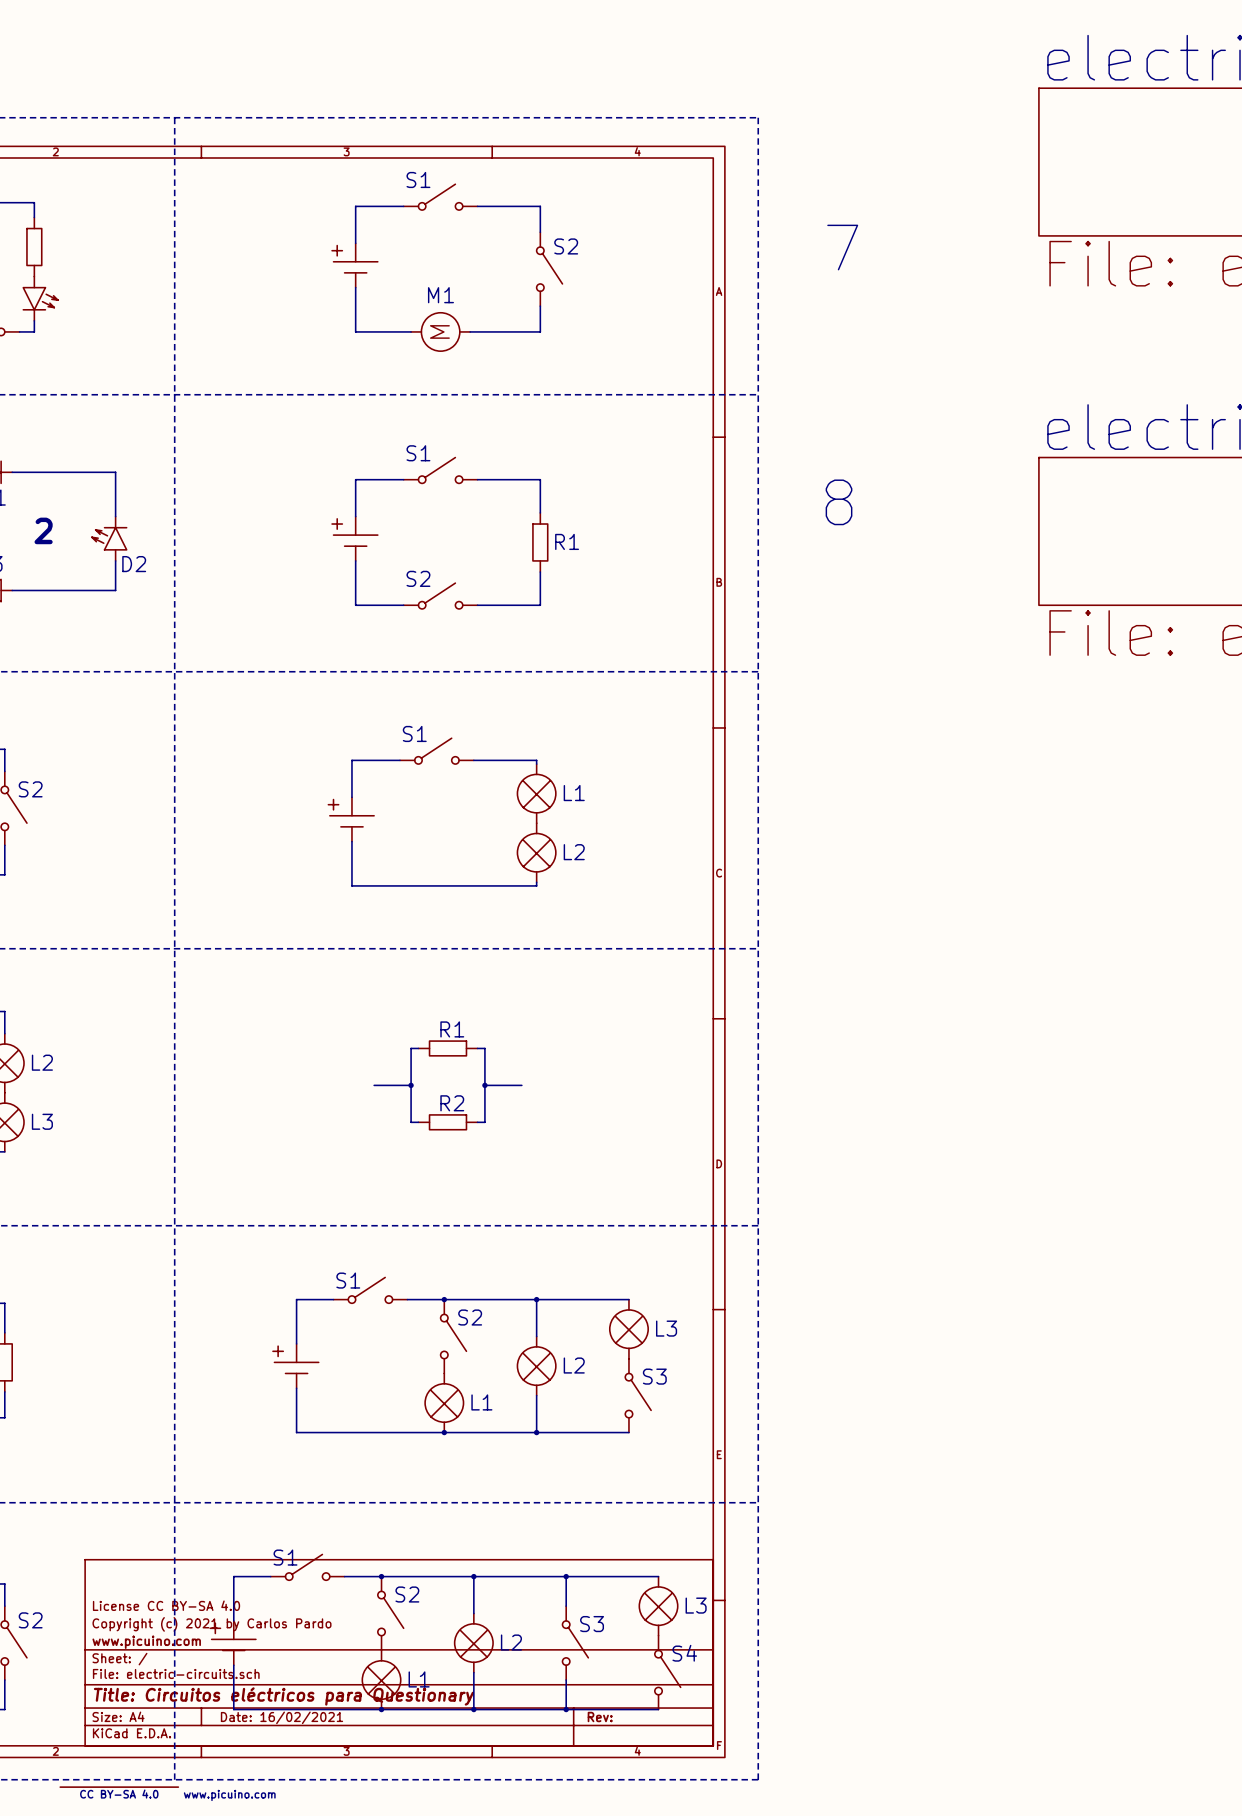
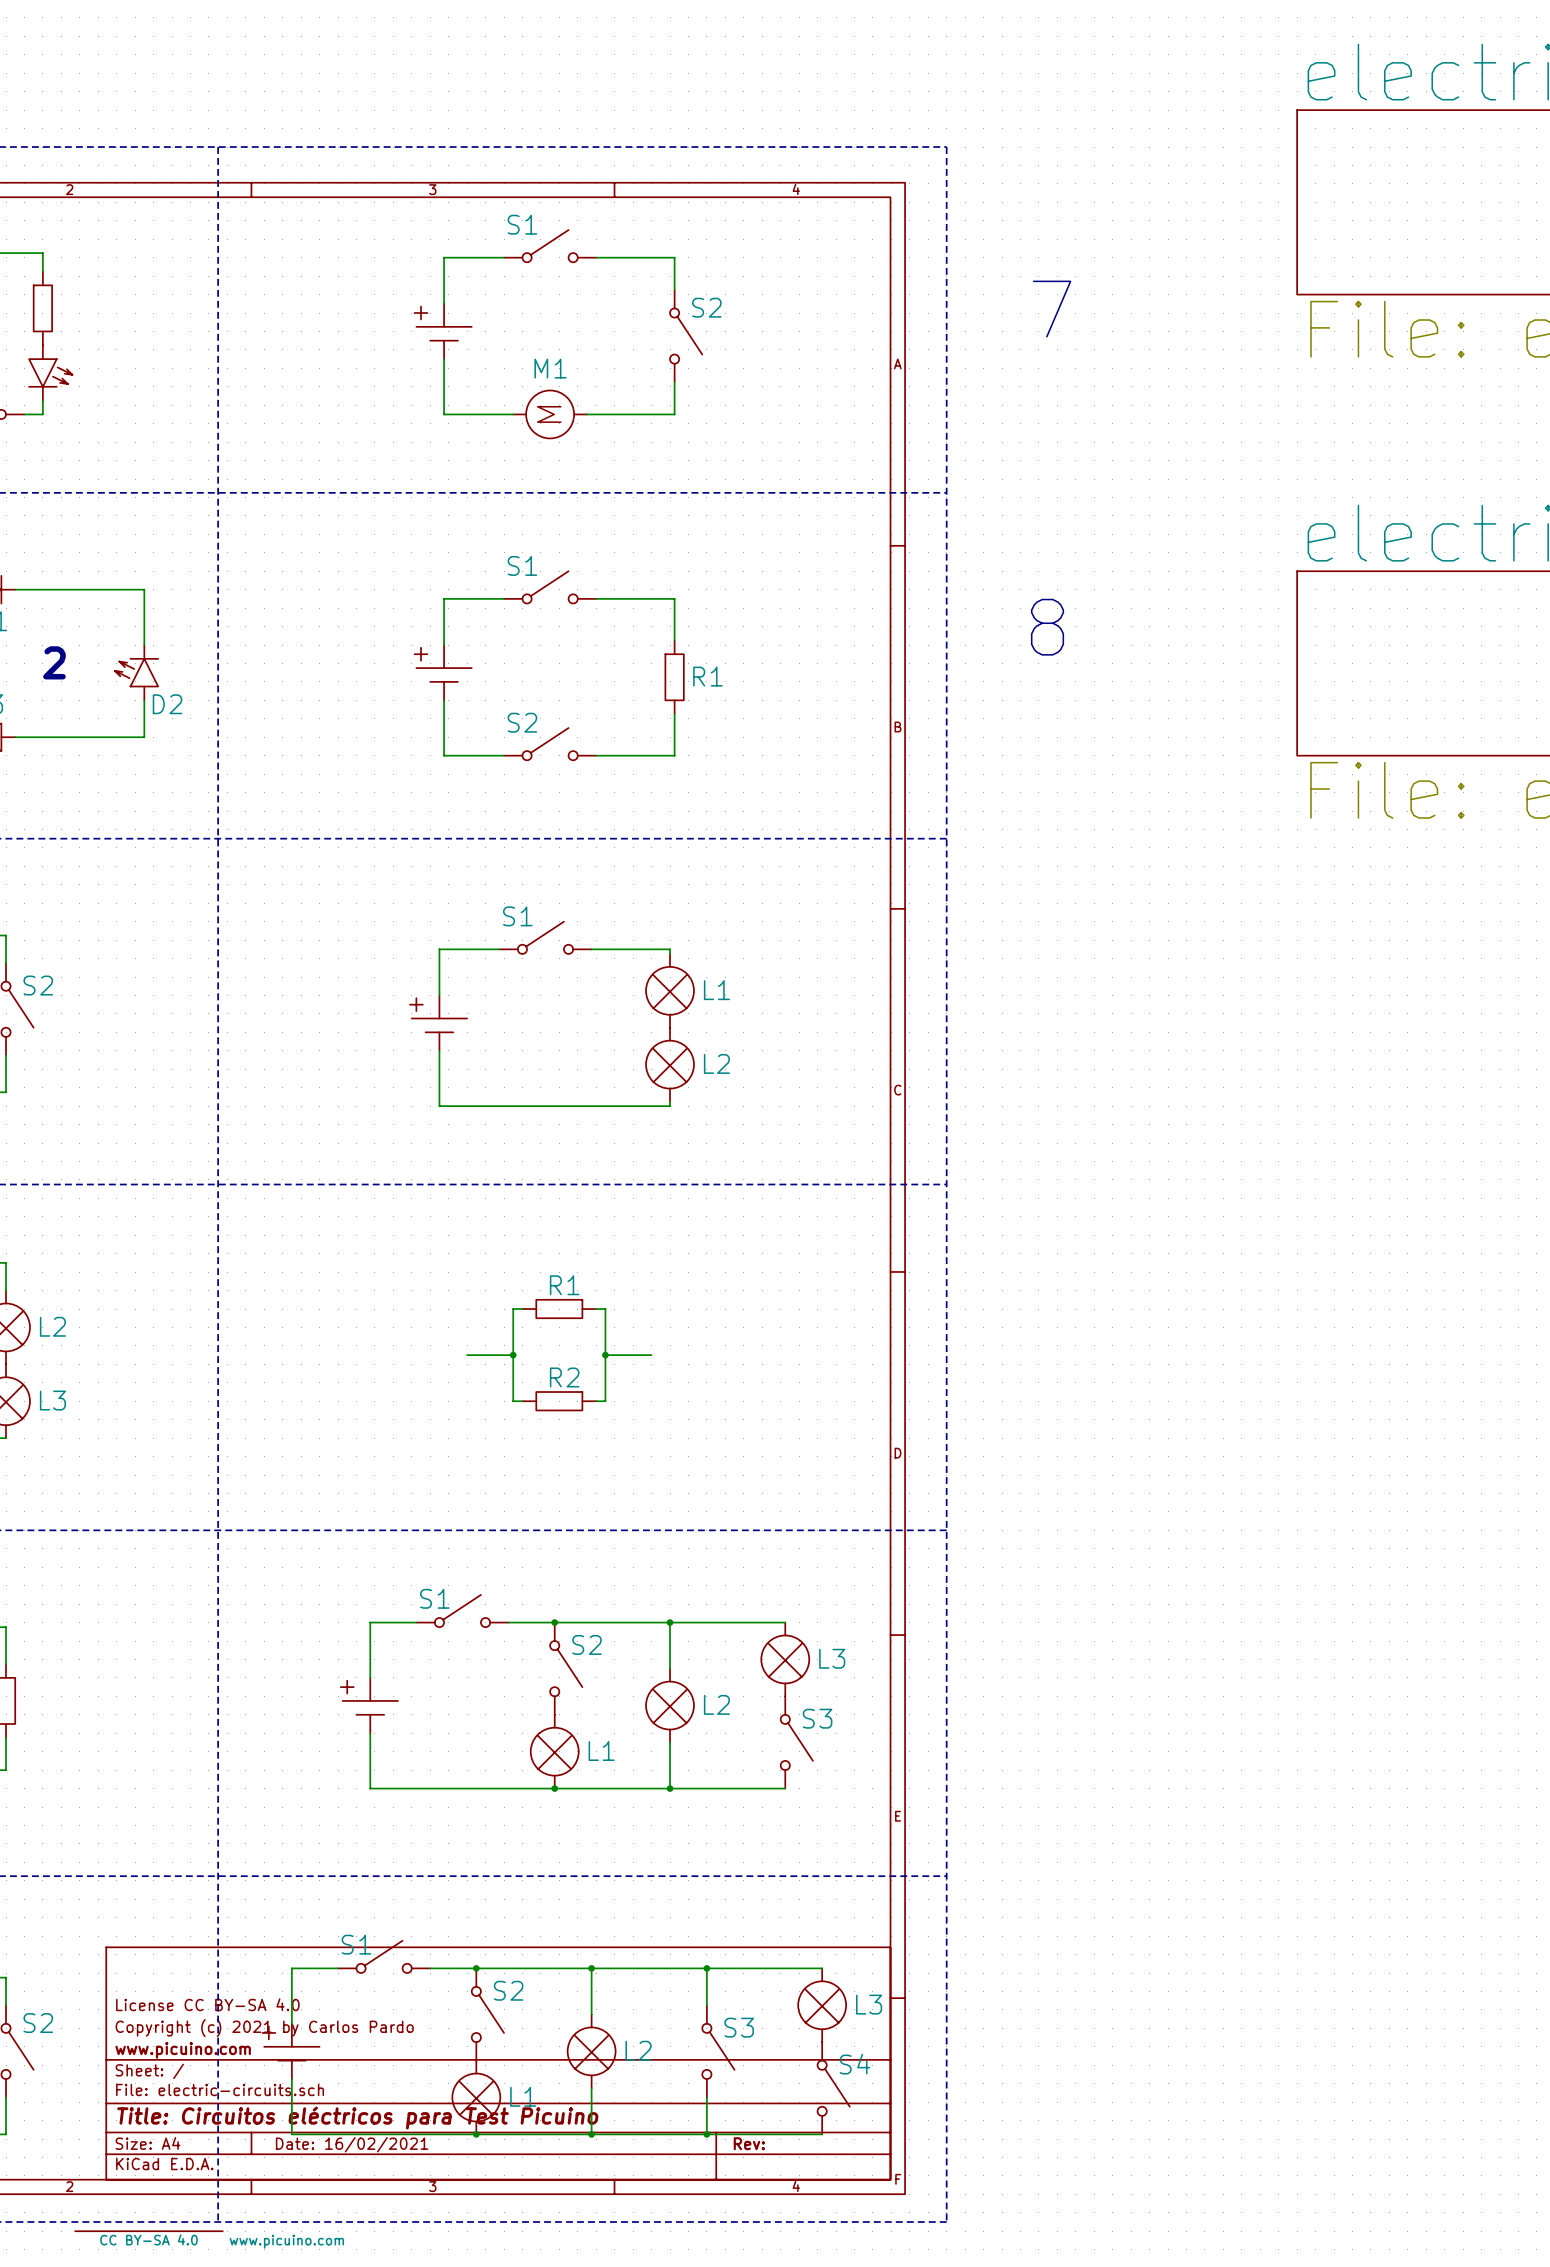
title block: Title: Circuitos eléctricos para Questionary (283, 1696) -> Title: Circuitos eléctricos para Test Picuino (357, 2118)

